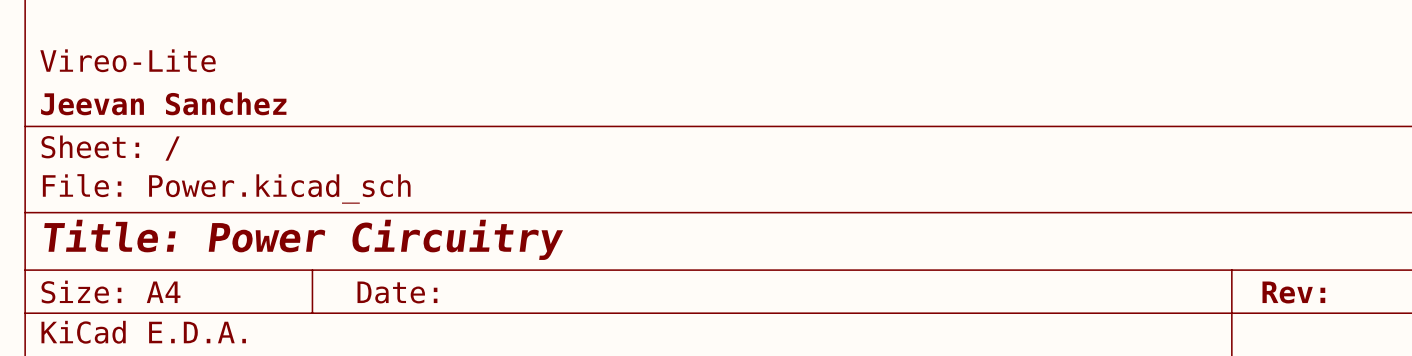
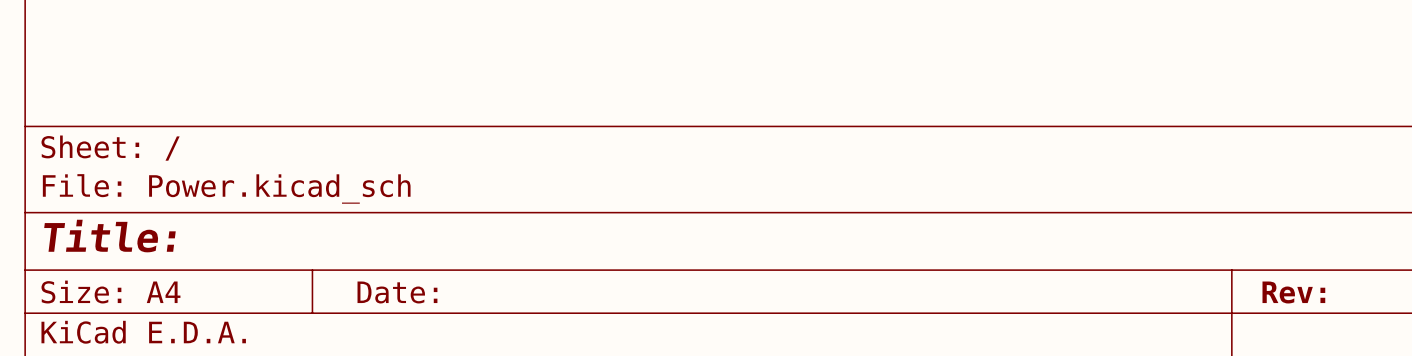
title block: Vireo-Lite (128, 60) -> none
title block: Jeevan Sanchez (163, 103) -> none
title block: Title: Power Circuitry (303, 239) -> Title: (109, 236)

